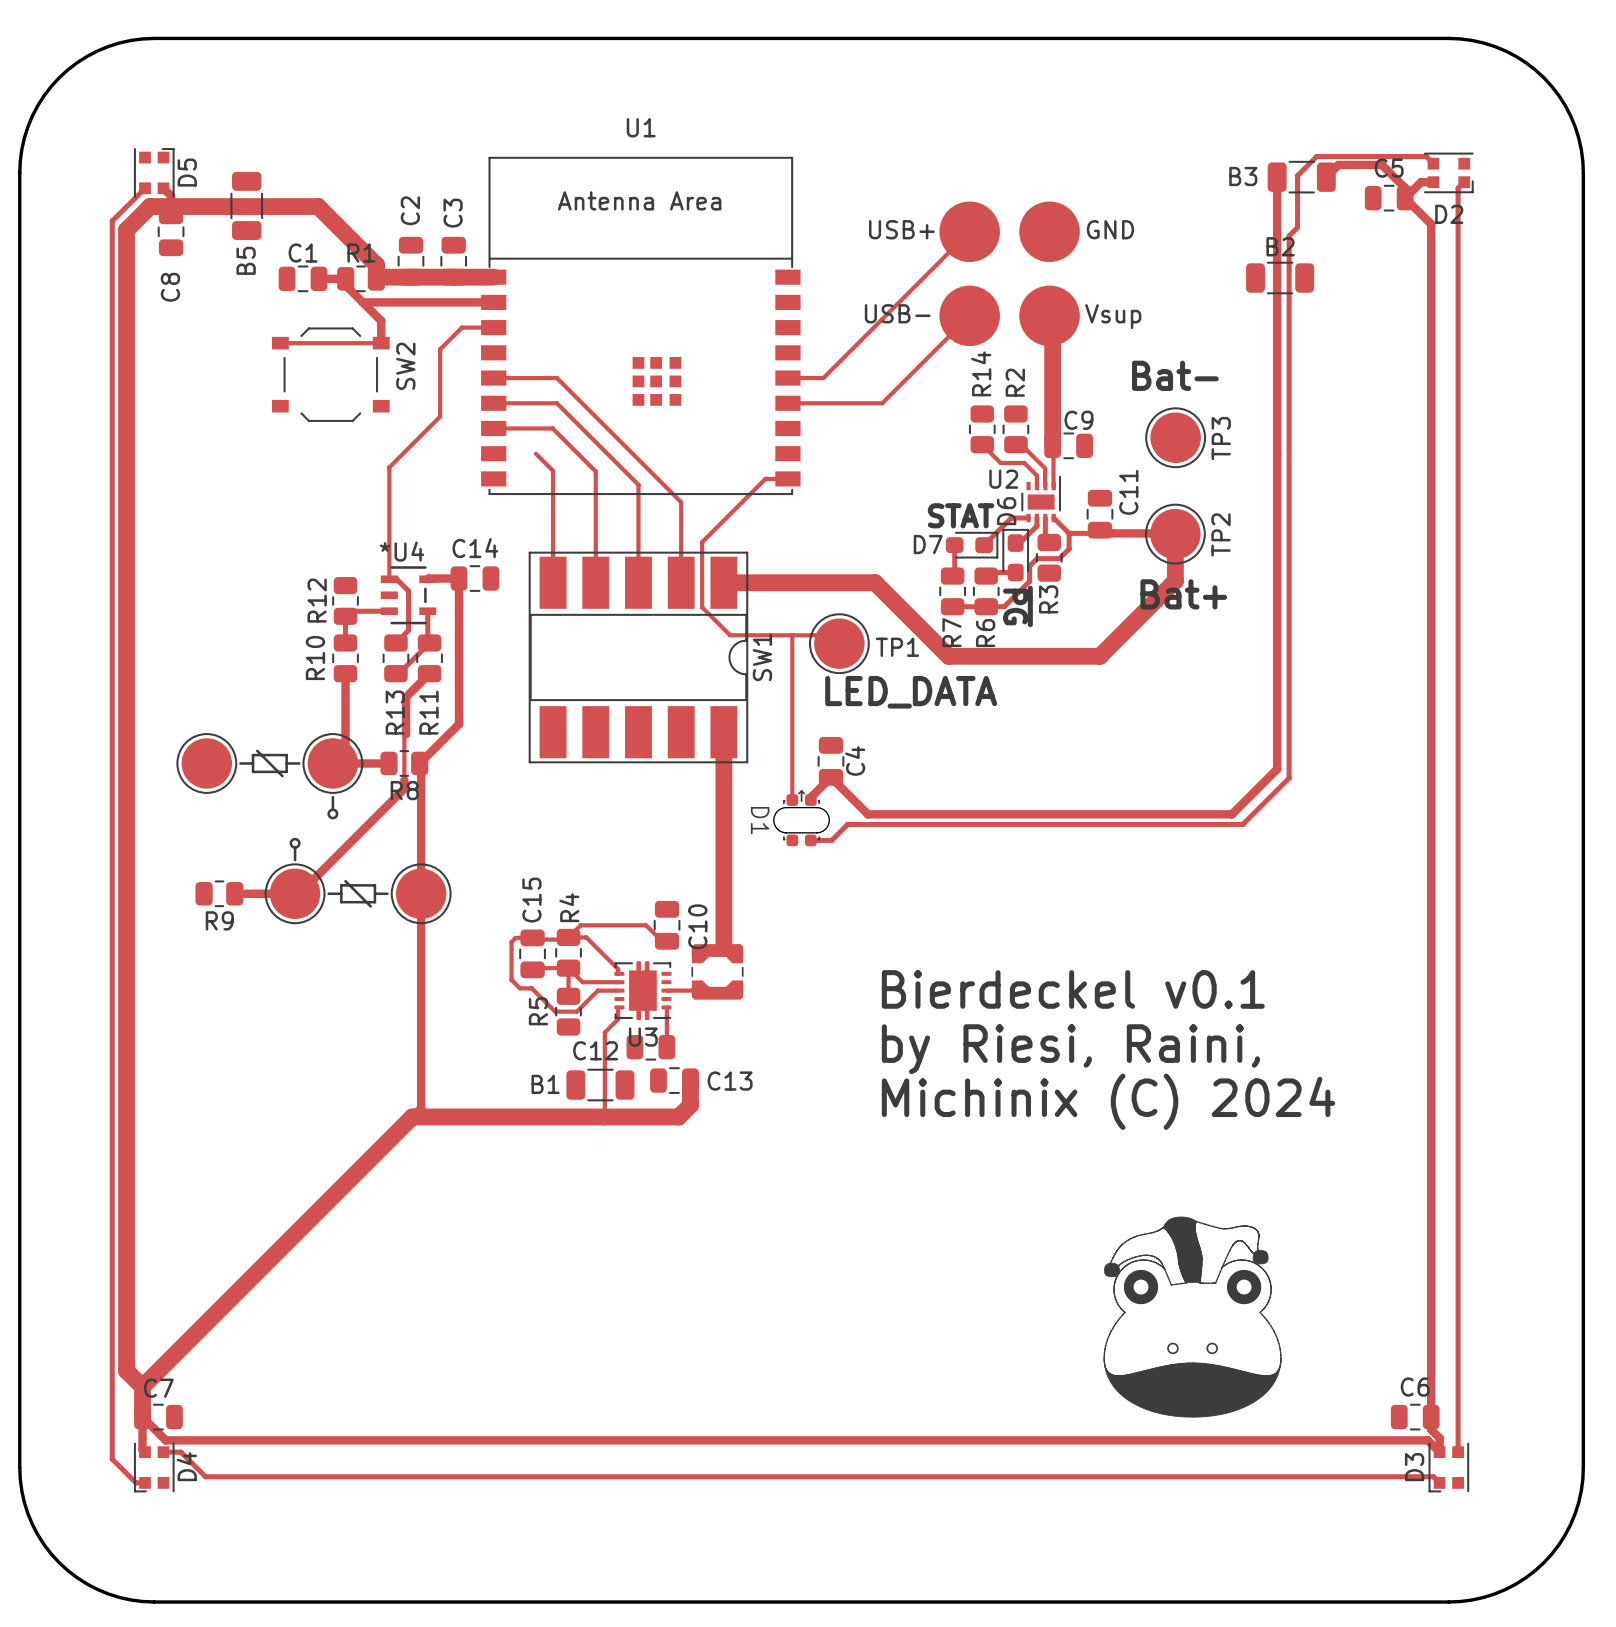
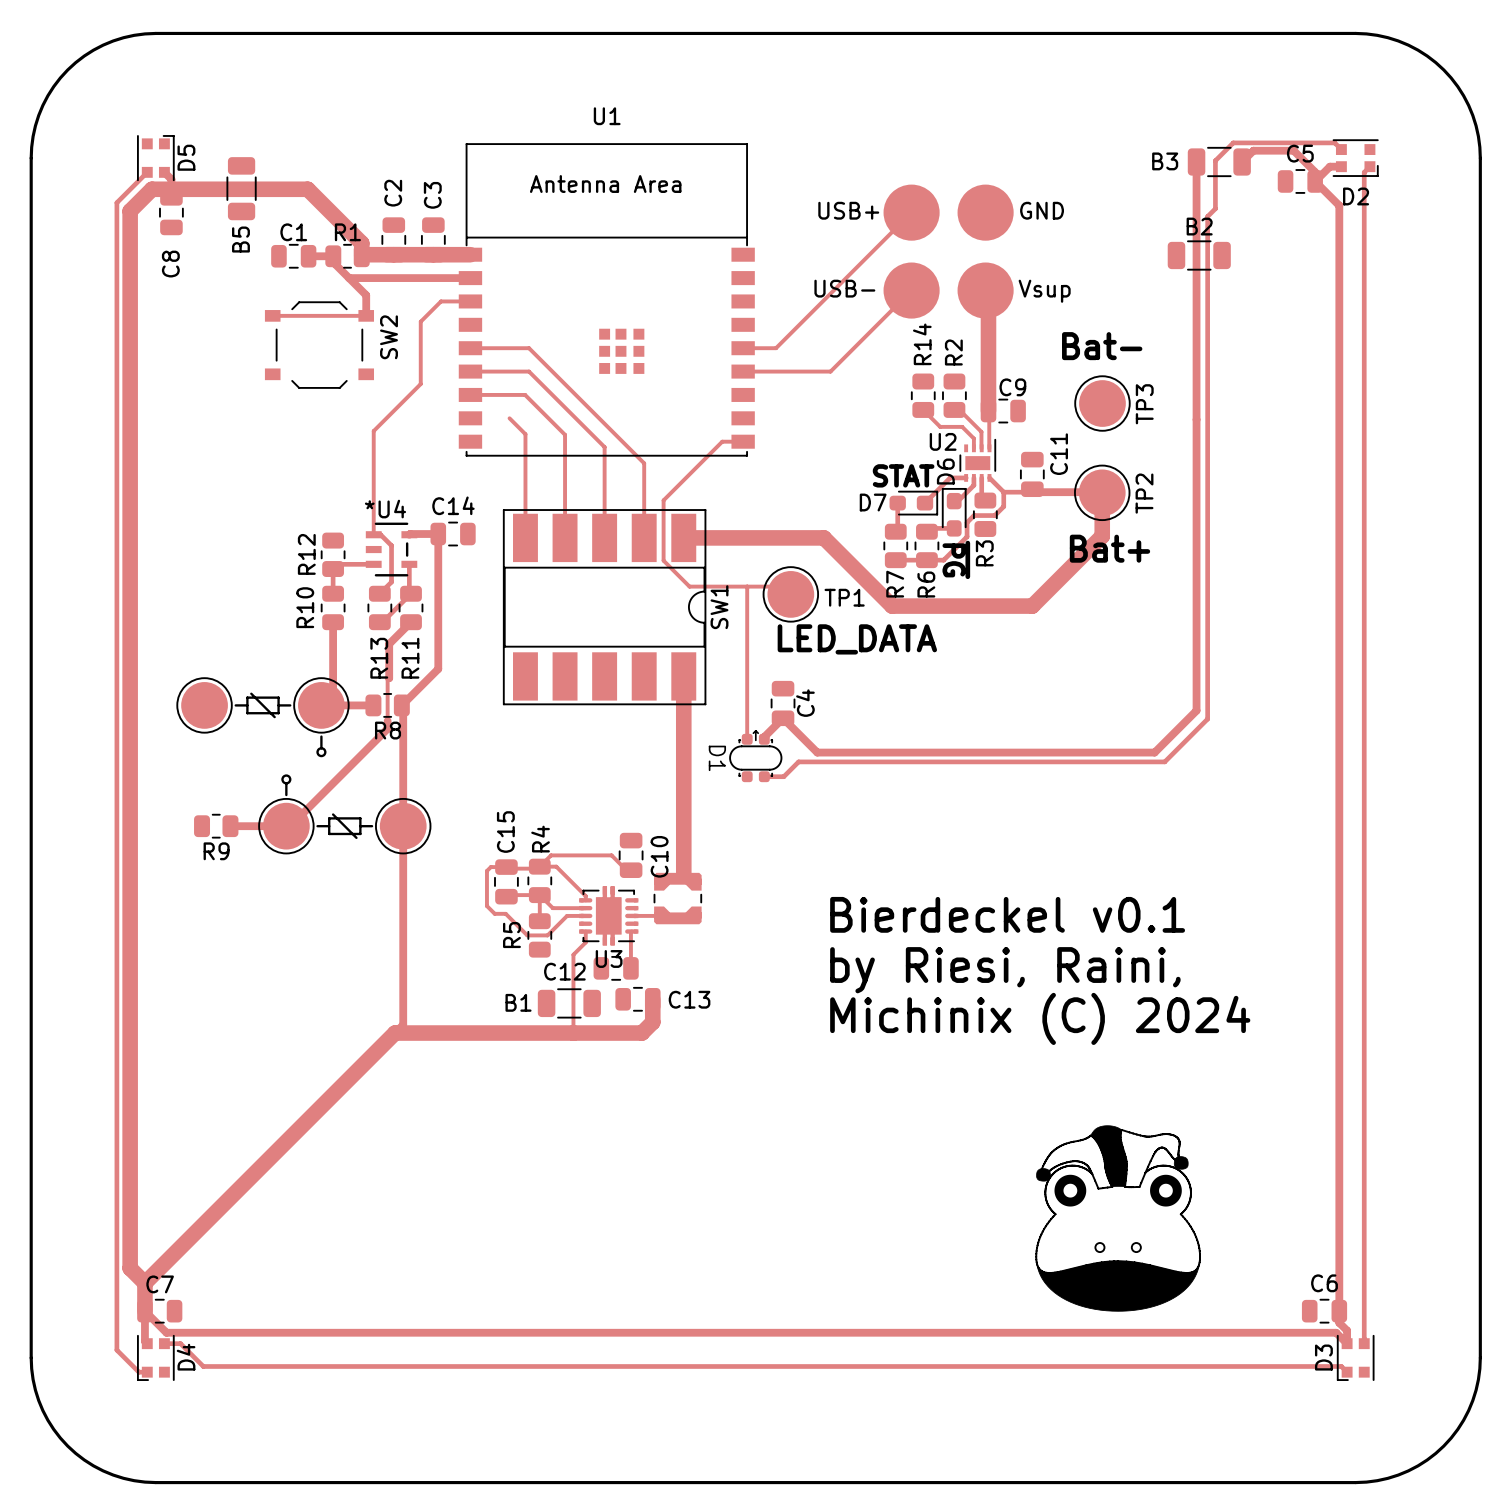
U3 footprint: [614, 961, 672, 1021] -> [579, 886, 639, 946]

